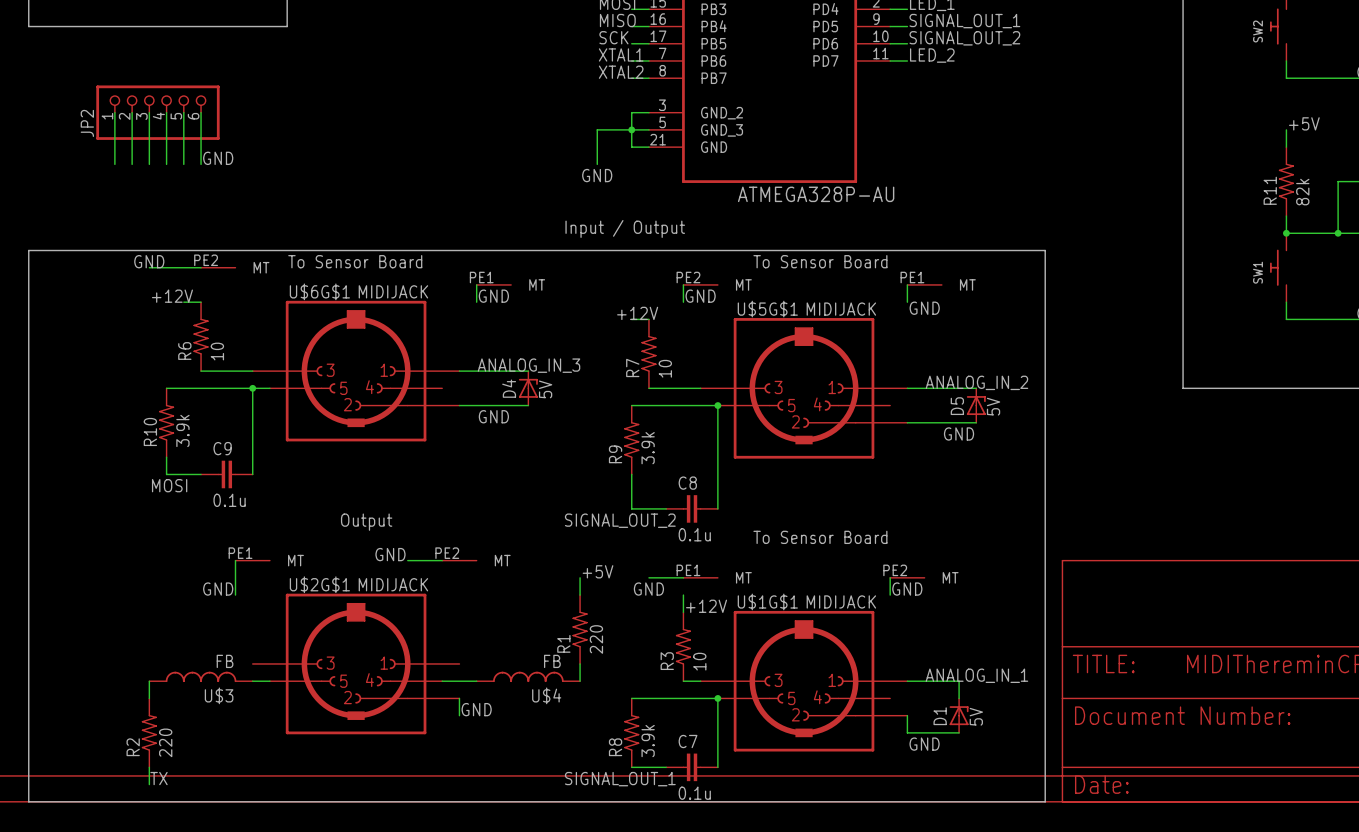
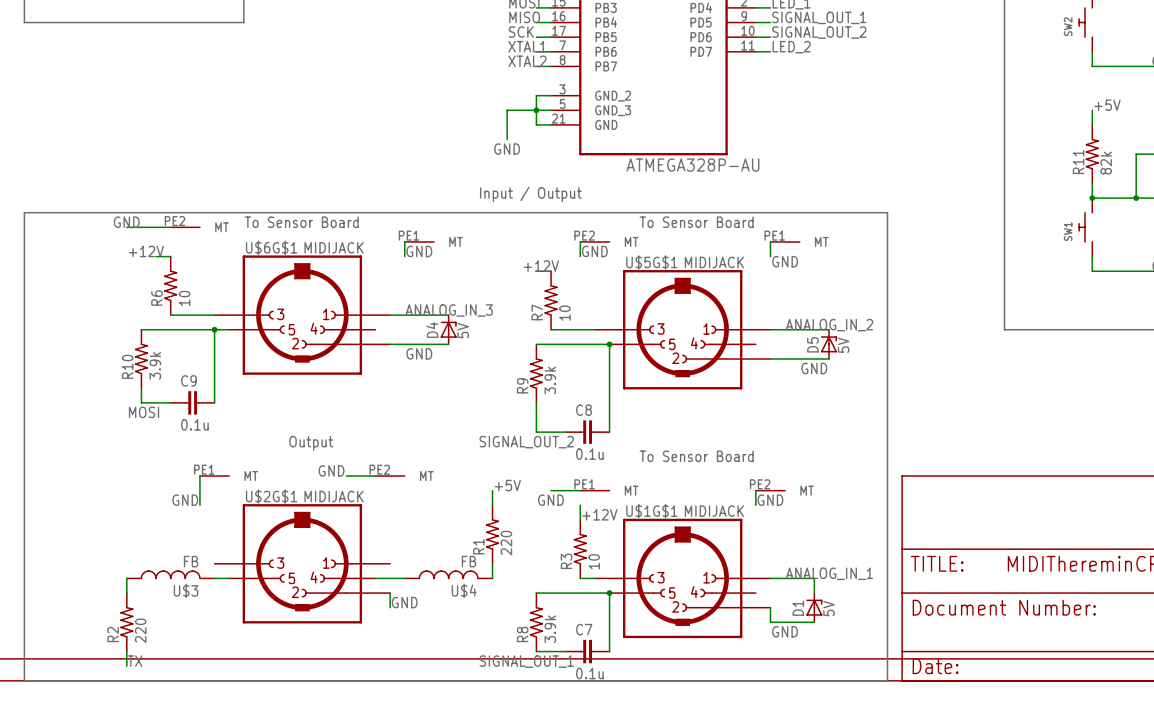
wire: (114, 112) (114, 164) -> none
wire: (132, 112) (132, 164) -> none
wire: (149, 112) (149, 164) -> none
JP2: (157, 112) -> none
wire: (166, 112) (166, 164) -> none
wire: (183, 112) (183, 164) -> none
wire: (201, 112) (201, 164) -> none
label: GND (218, 158) -> none

